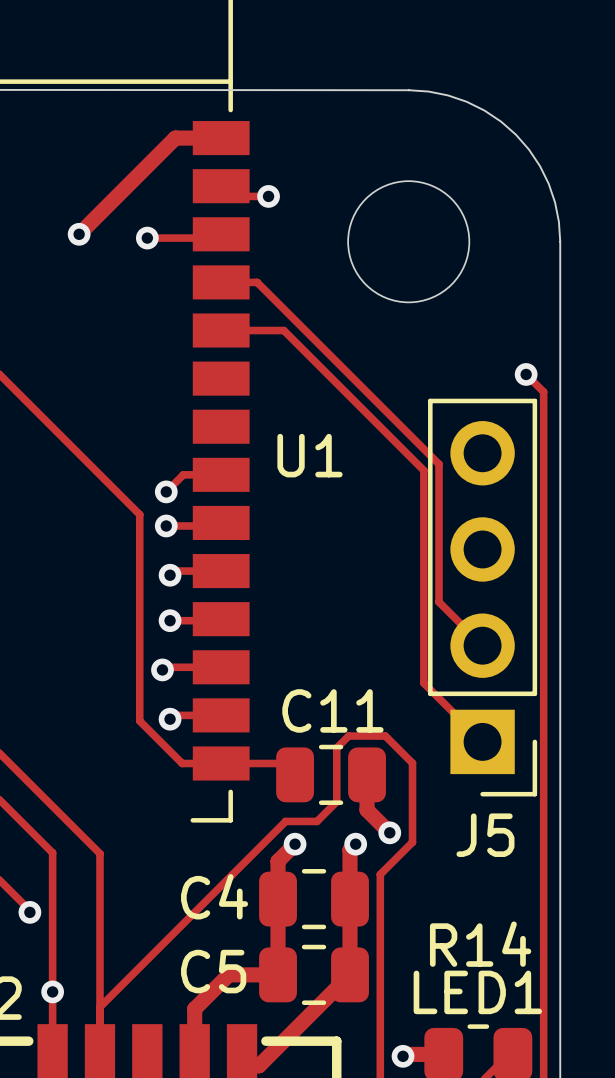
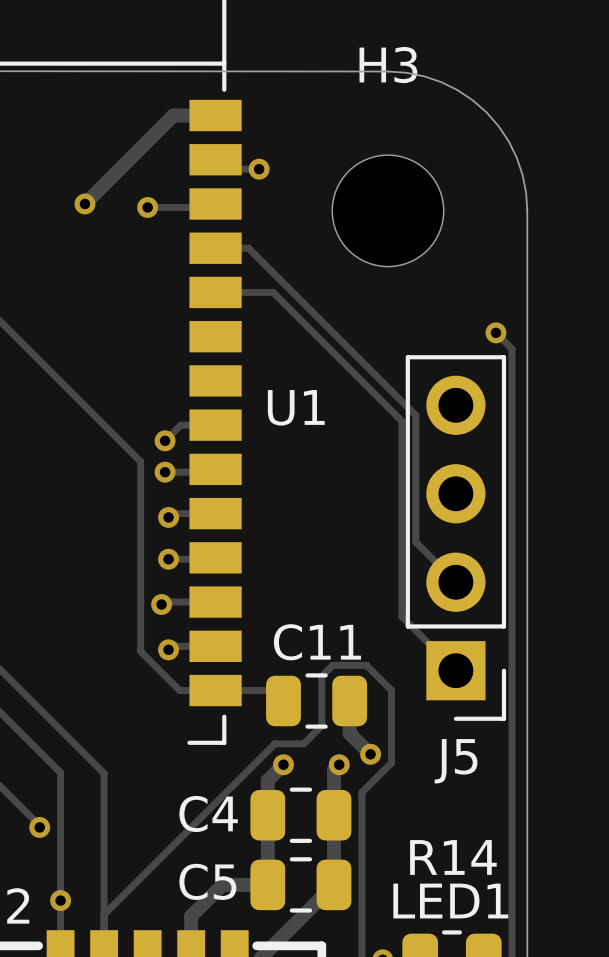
H3 name: none -> H3 (388, 65)

